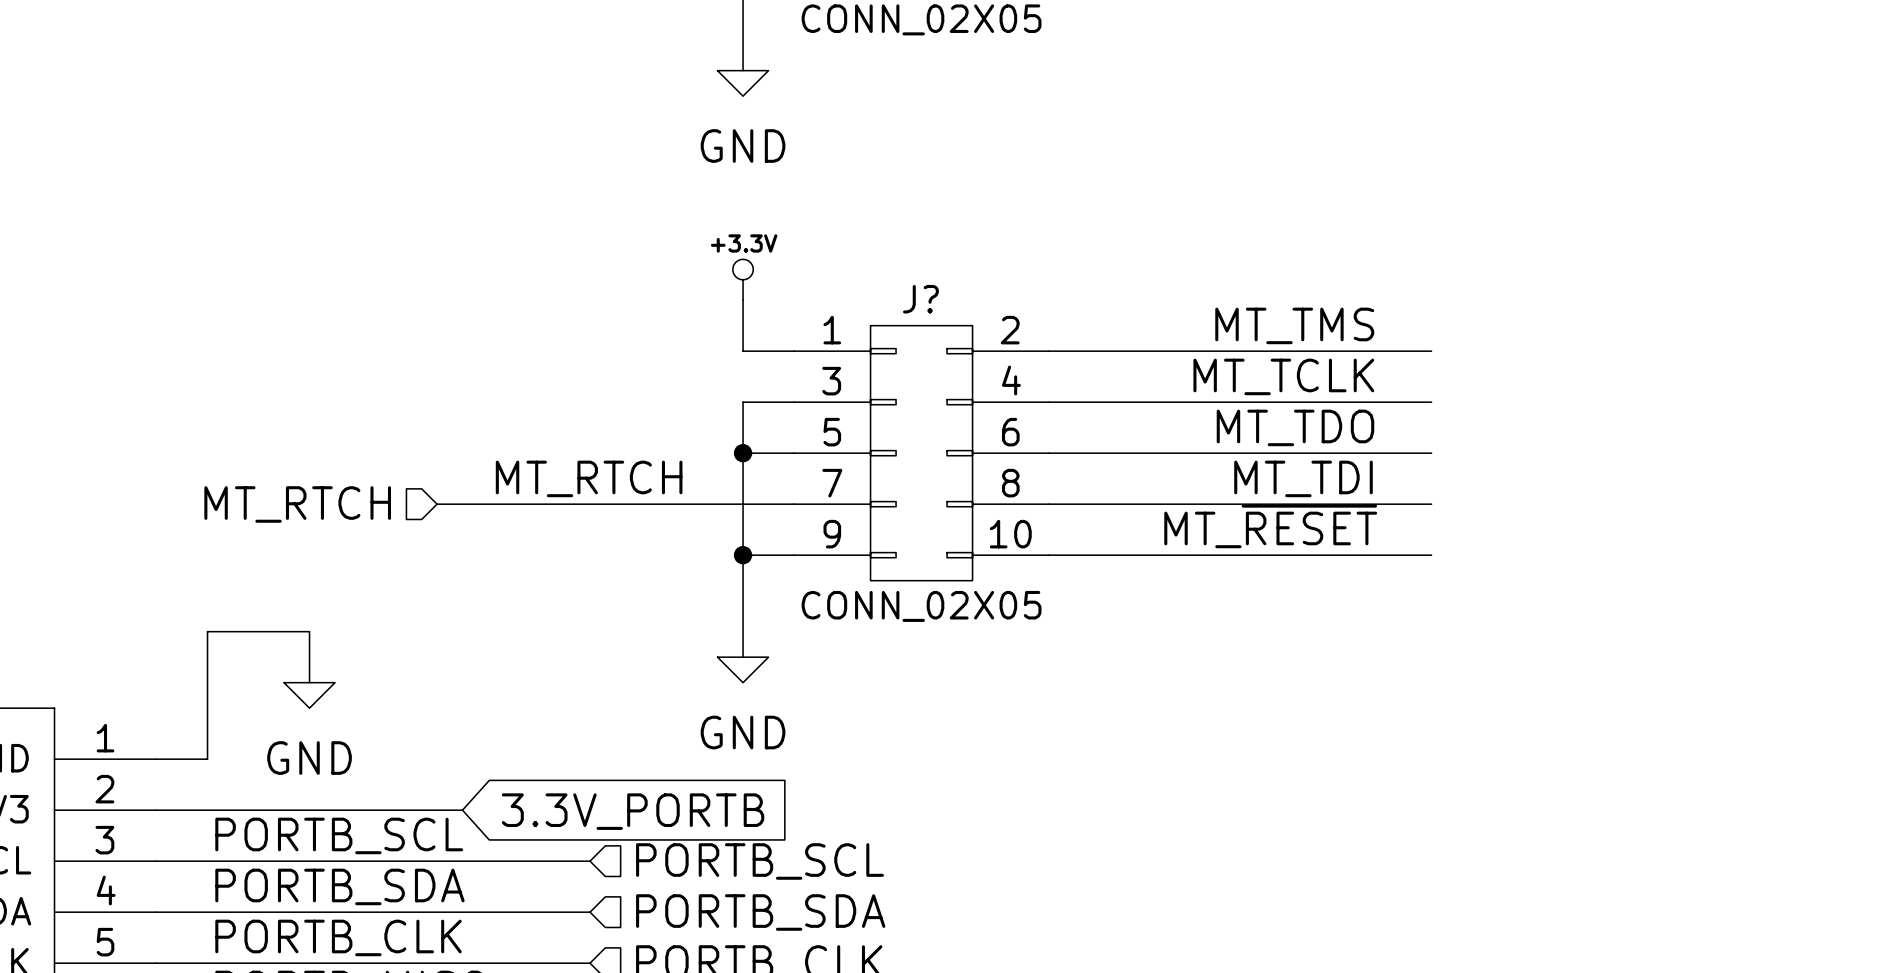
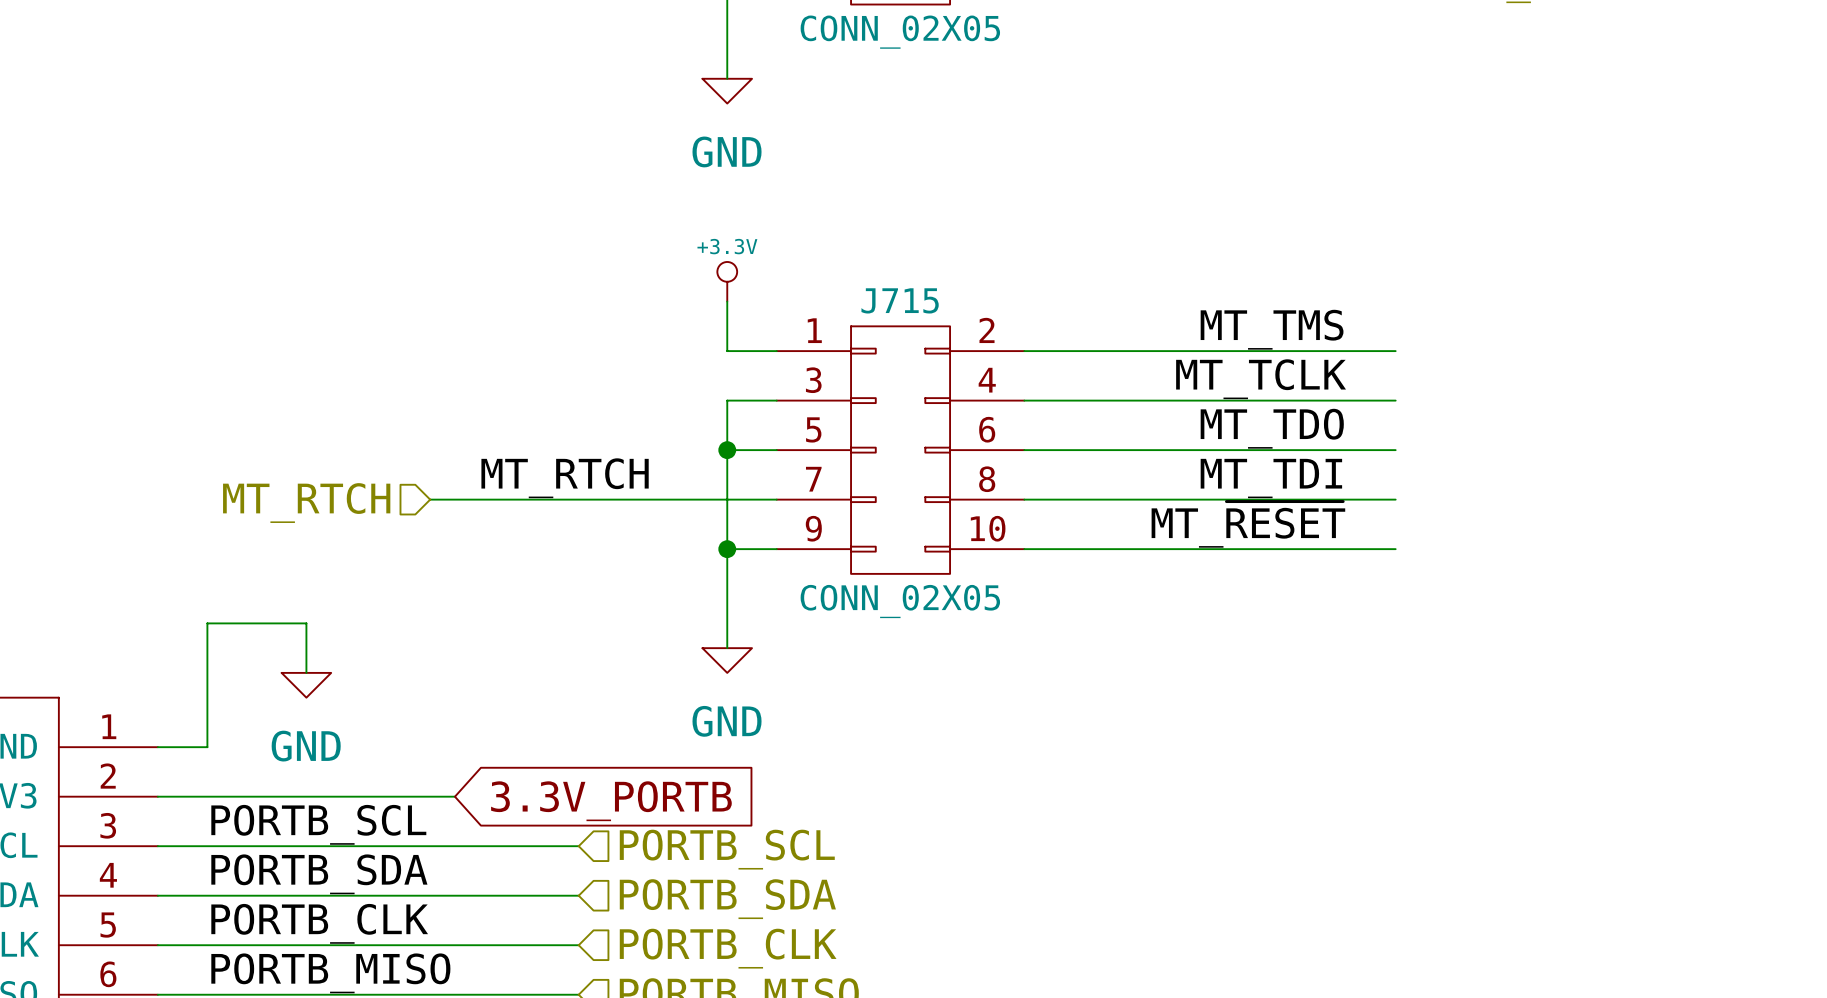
J? name: J? (920, 299) -> J715 (900, 300)

